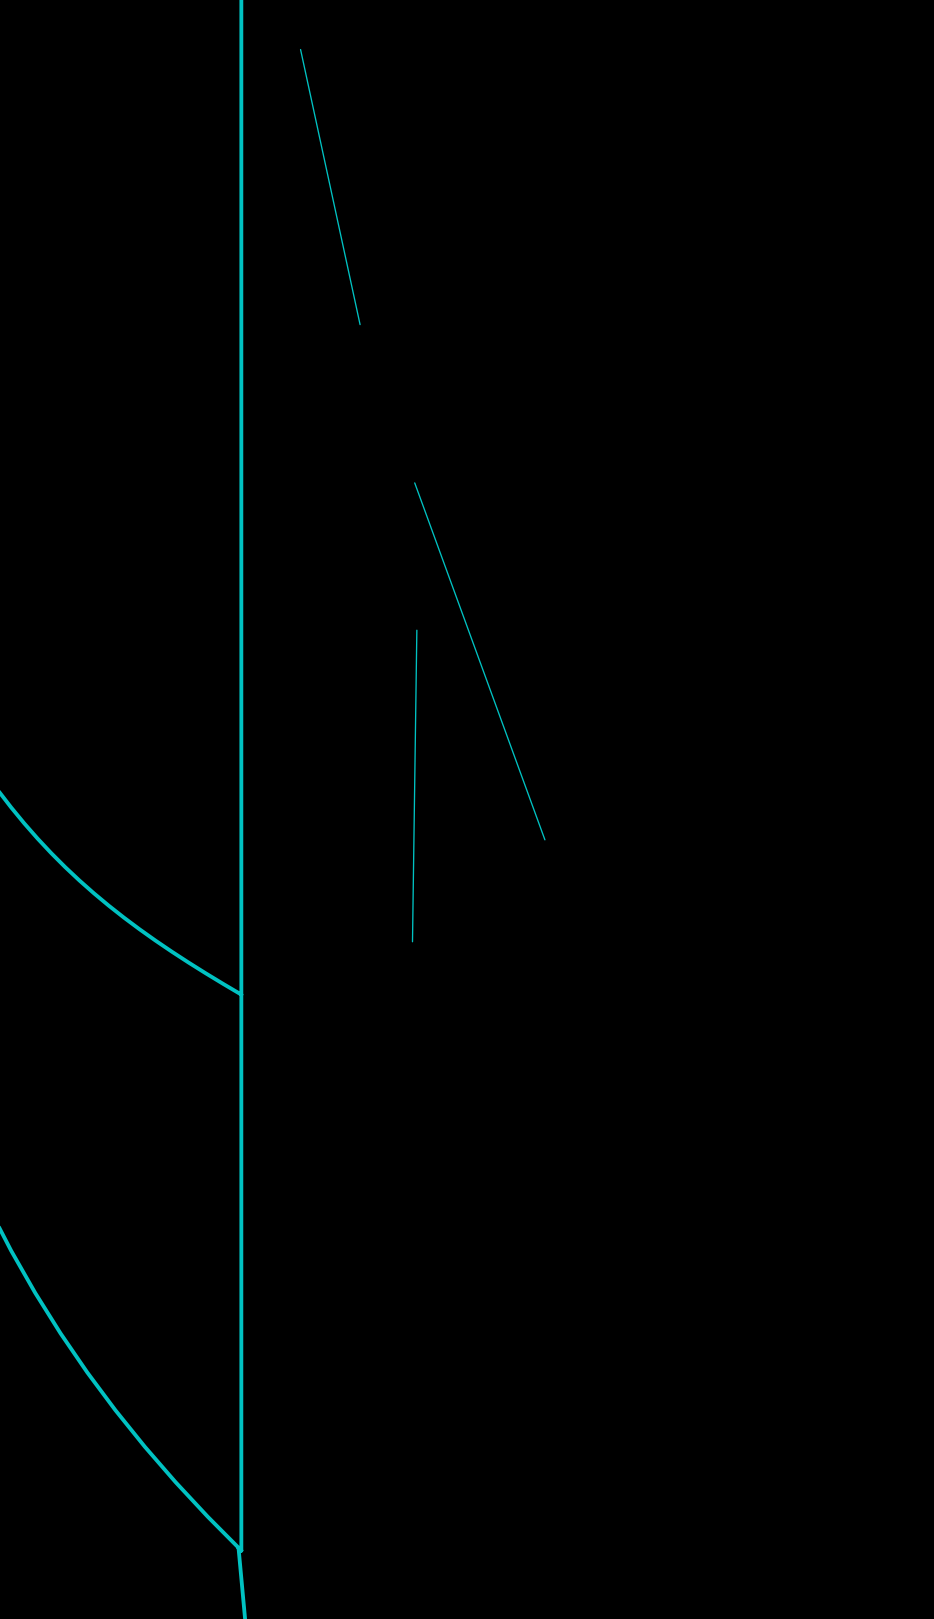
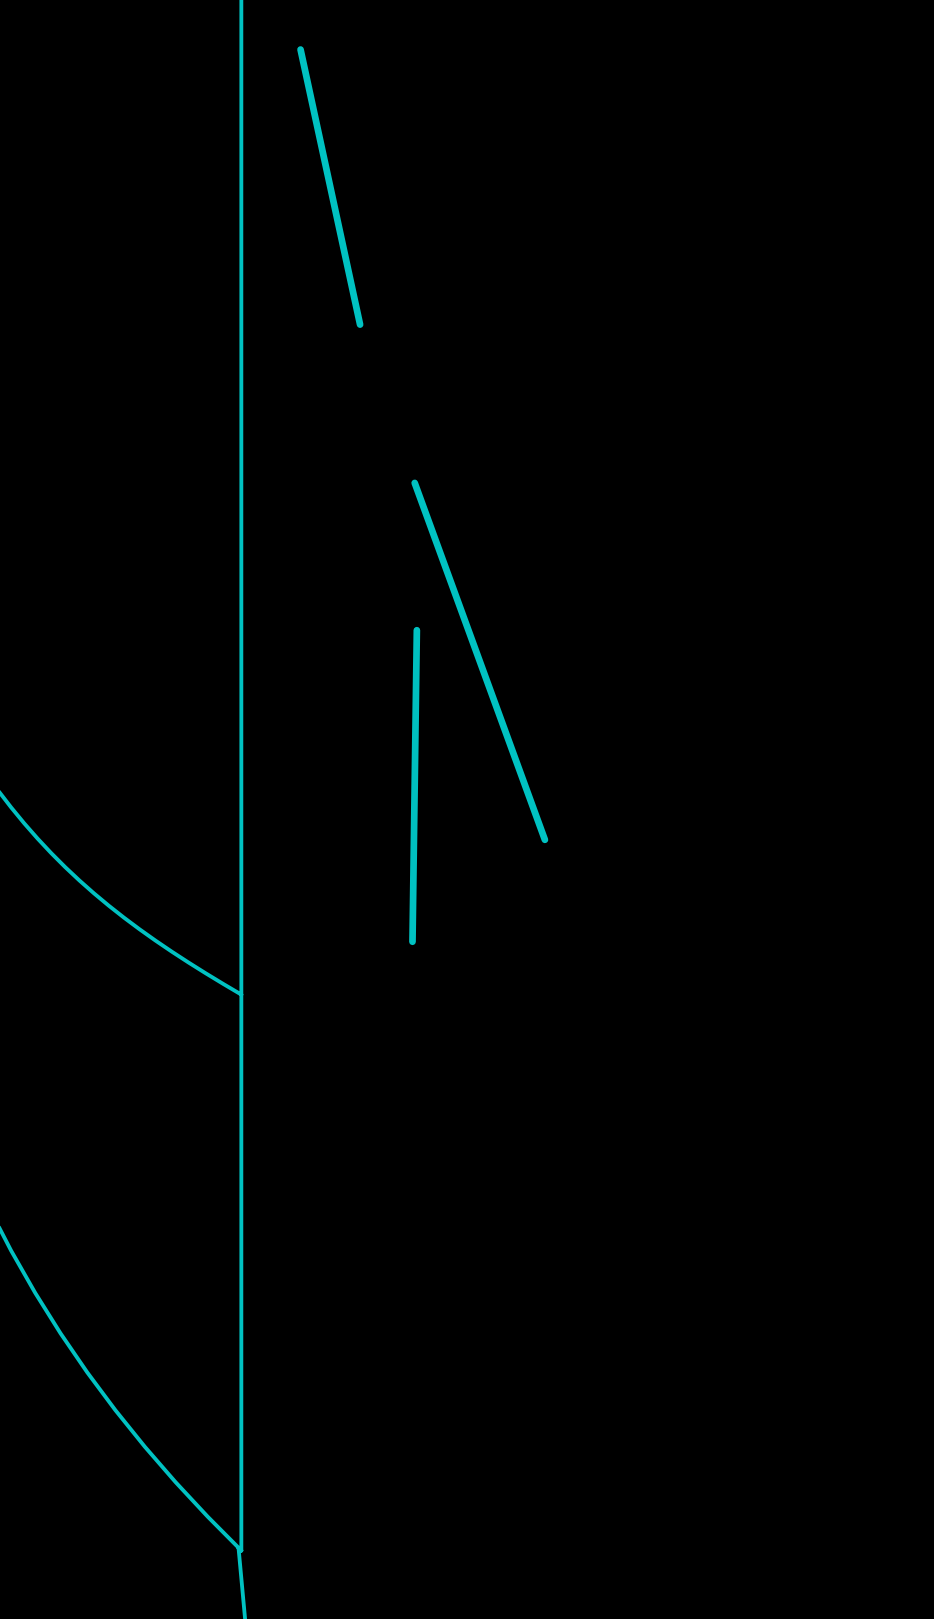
line width: thin (300, 49) (360, 324) -> thick (300, 49) (360, 324)
line width: thin (414, 482) (544, 839) -> thick (414, 482) (544, 839)
line width: thin (416, 630) (412, 941) -> thick (416, 630) (412, 941)

